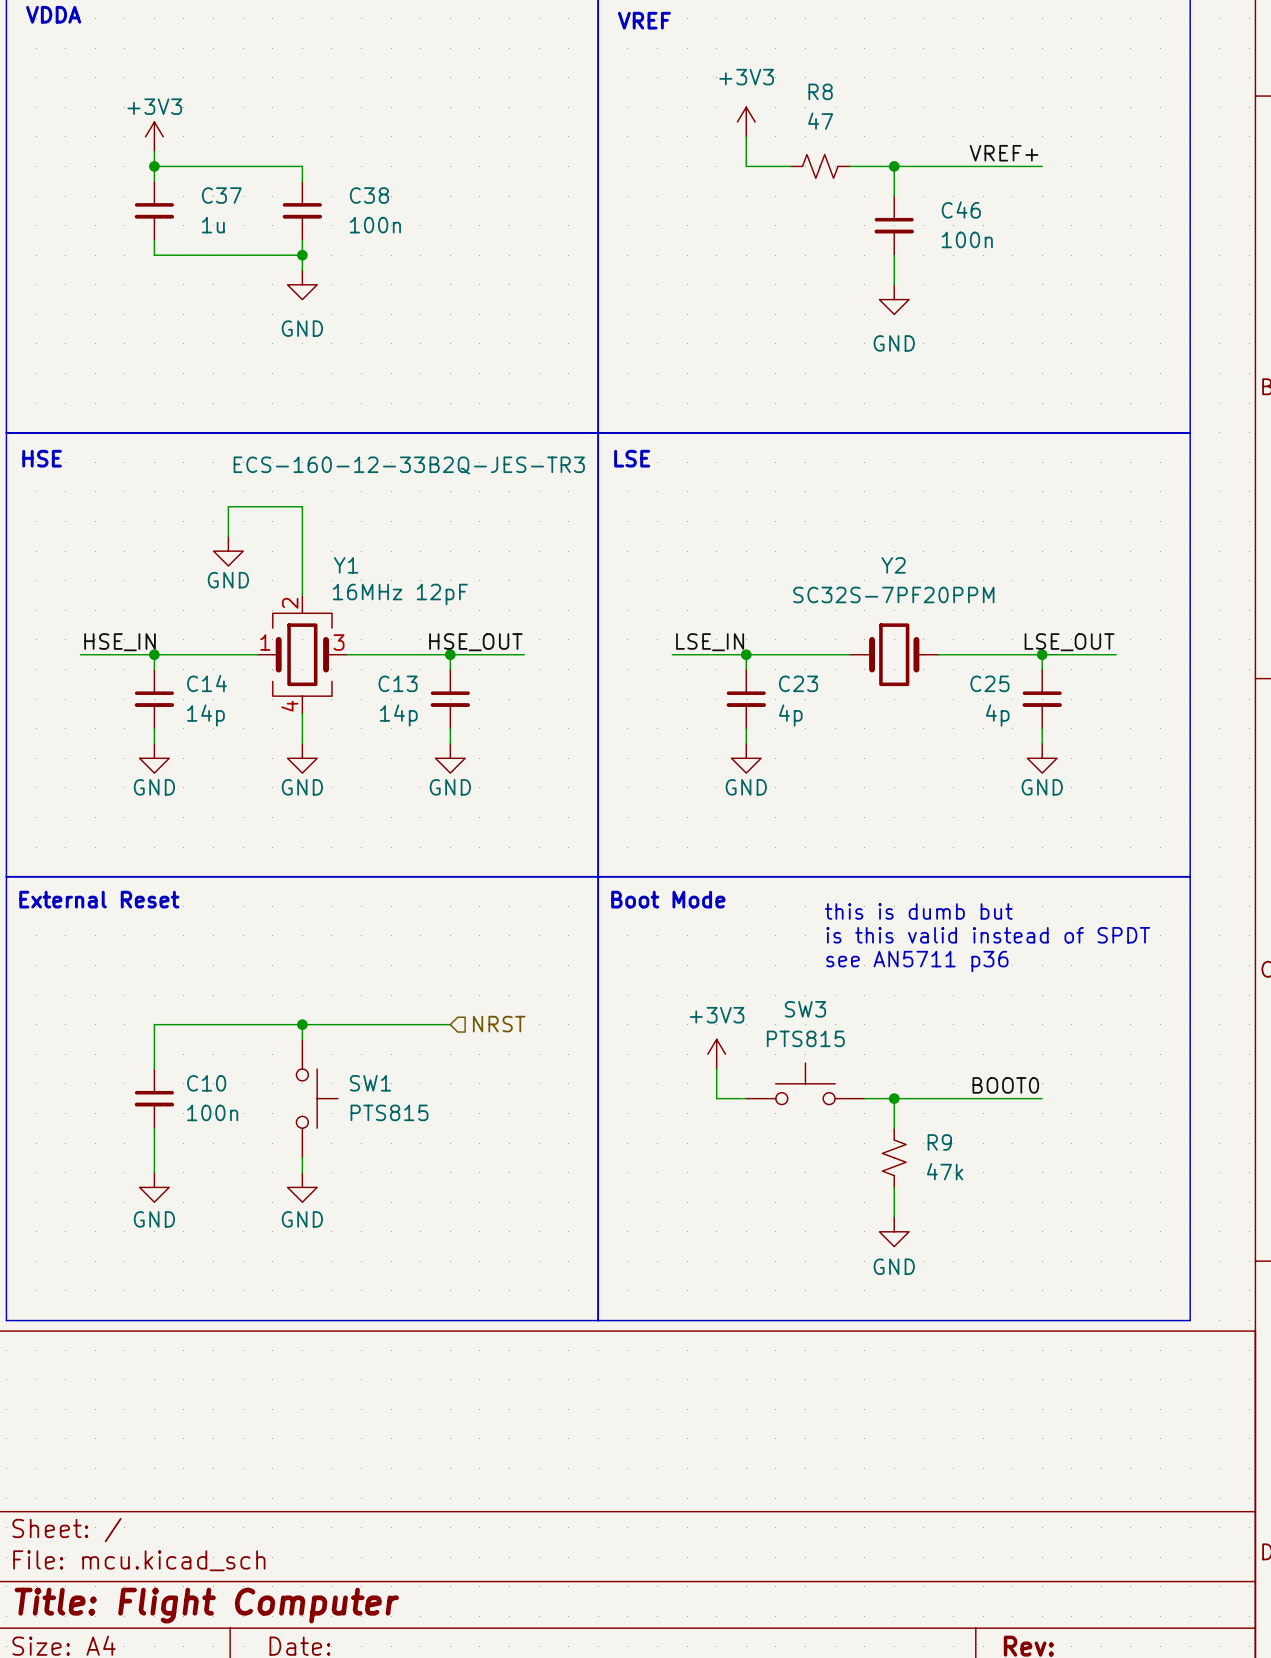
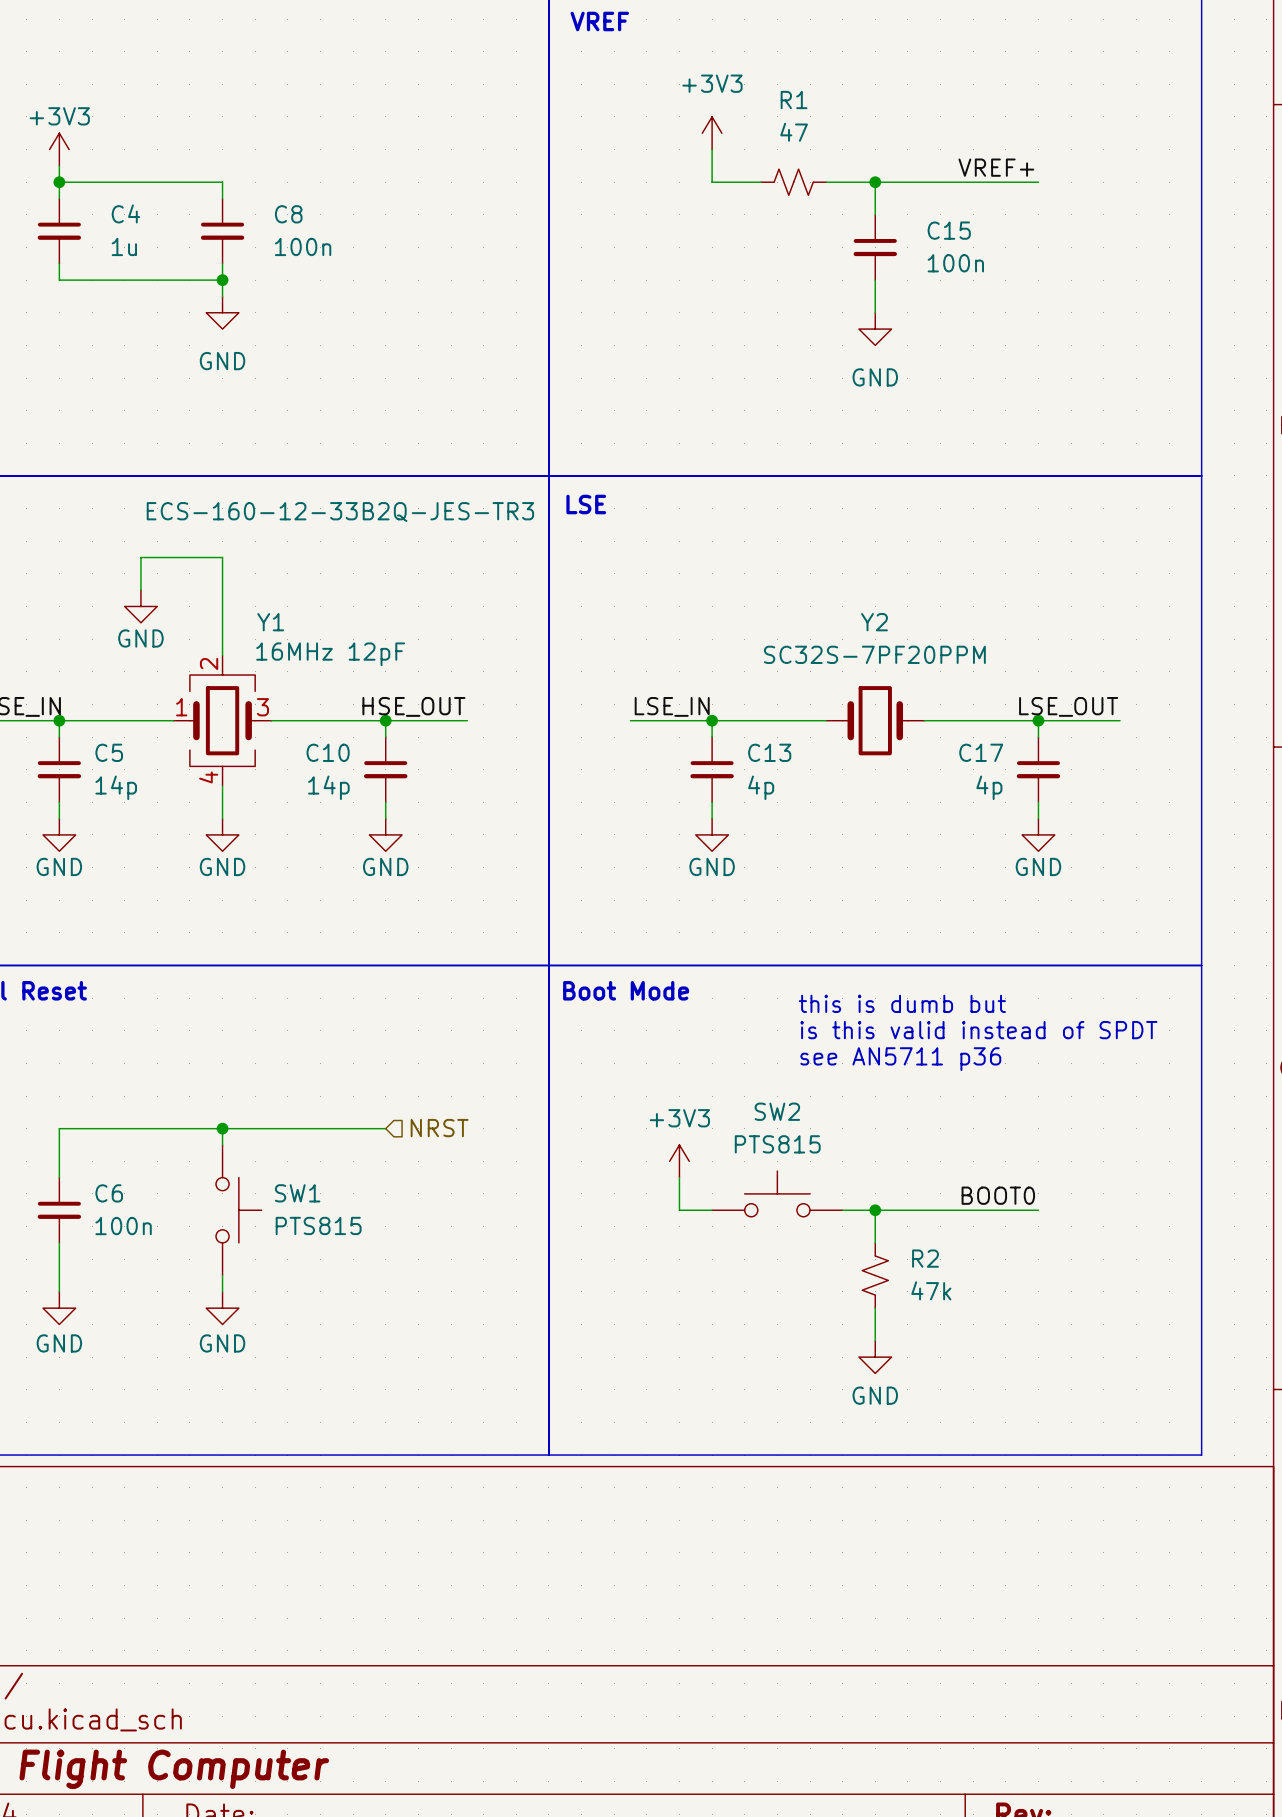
R8 name: R8 (820, 91) -> R1 (794, 100)
C37 name: C37 (221, 195) -> C4 (125, 213)
C38 name: C38 (369, 195) -> C8 (288, 214)
C46 name: C46 (961, 209) -> C15 (949, 230)
C14 name: C14 (207, 683) -> C5 (109, 752)
C13 name: C13 (398, 683) -> C10 (328, 752)
C23 name: C23 (798, 683) -> C13 (769, 752)
C25 name: C25 (989, 683) -> C17 (981, 752)
SW3 name: SW3 (805, 1009) -> SW2 (777, 1111)
C10 name: C10 (206, 1083) -> C6 (109, 1193)
R9 name: R9 (939, 1142) -> R2 (925, 1258)

